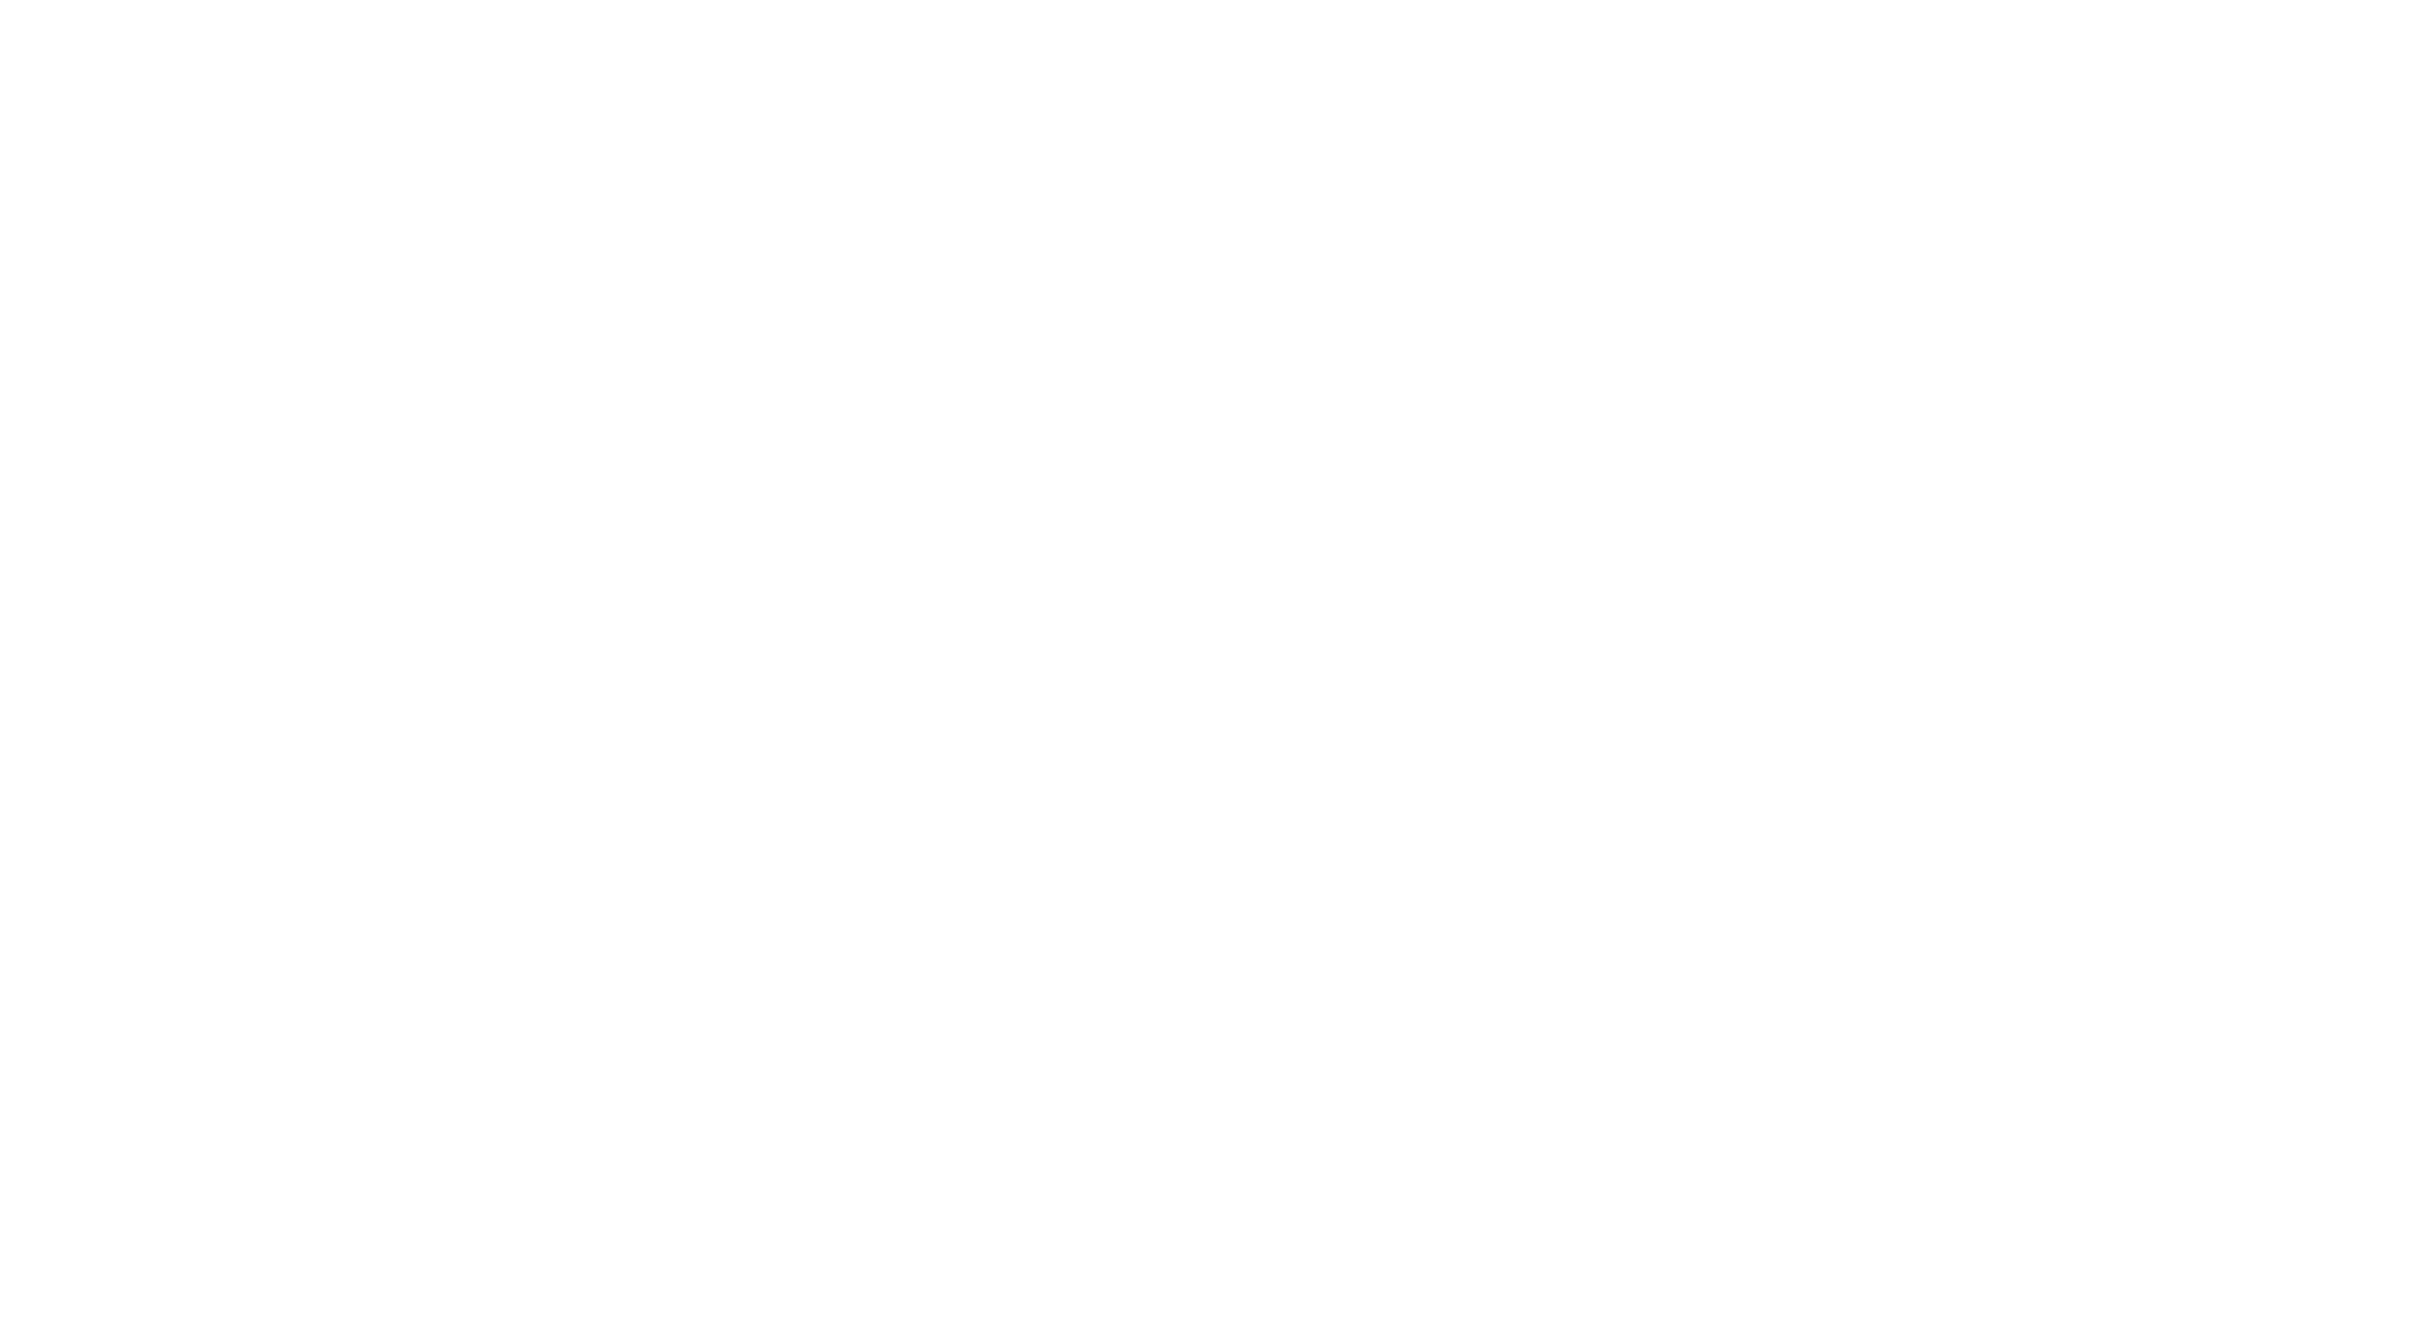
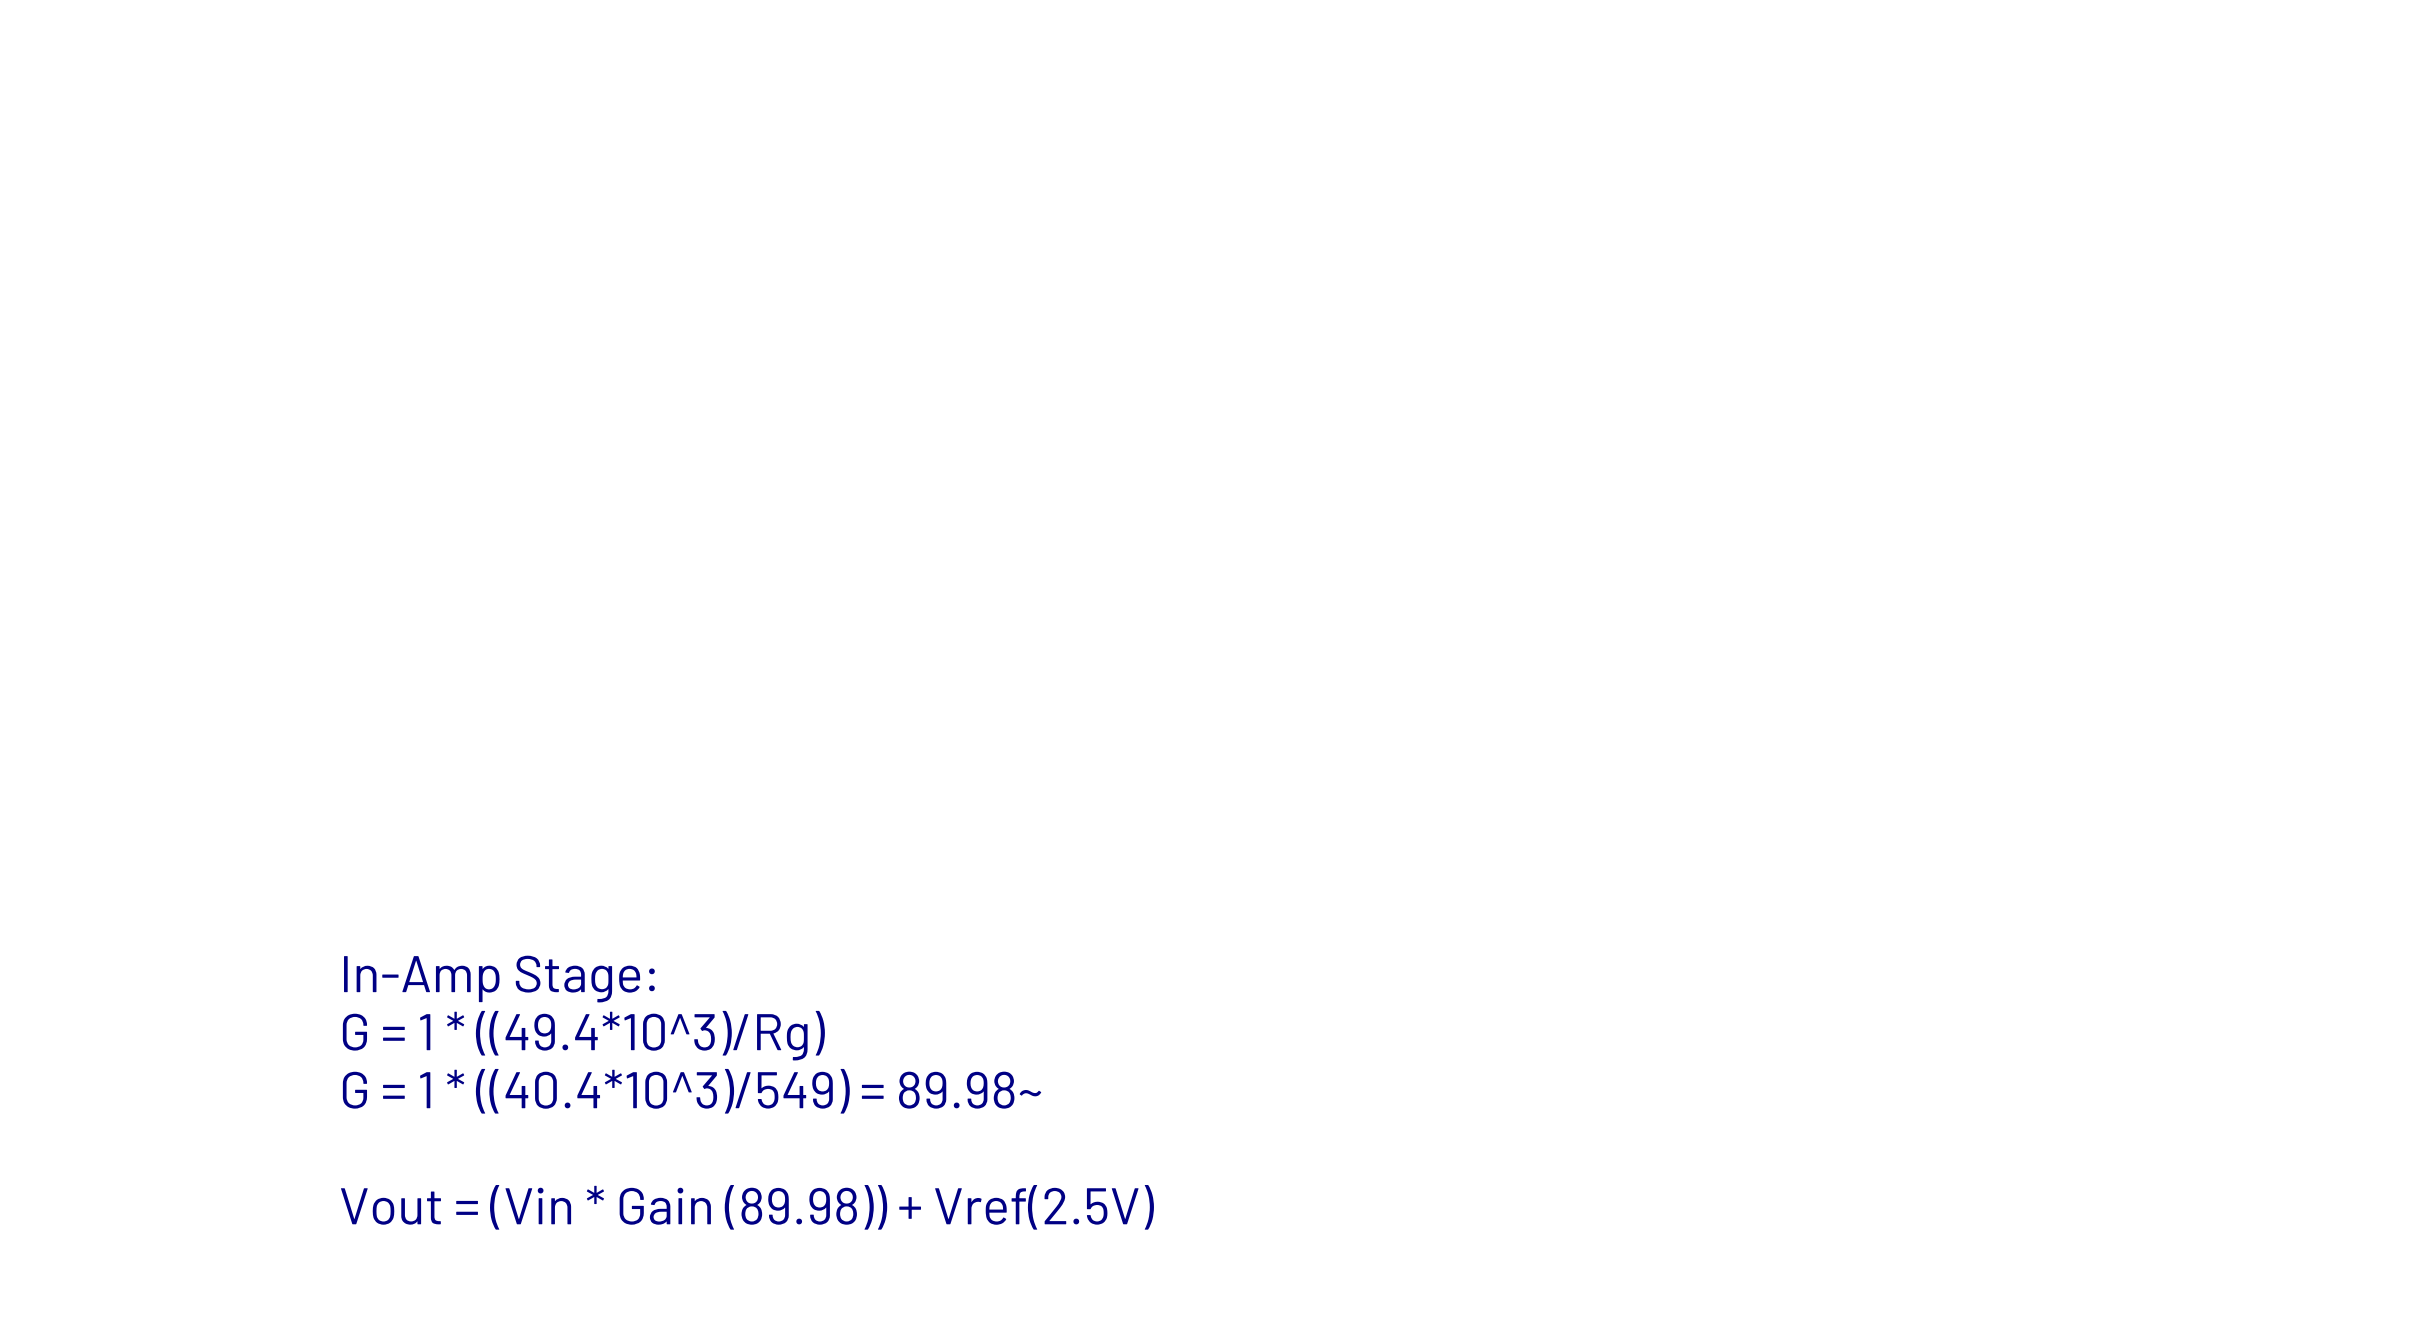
text: none -> In-Amp Stage: (499, 979)
text: none -> G = 1 * ((49.4*10^3)/Rg) (583, 1035)
text: none -> G = 1 * ((40.4*10^3)/549) = 89.98~ (692, 1091)
text: none -> Vout = (Vin * Gain (89.98)) + Vref(2.5V) (747, 1207)

